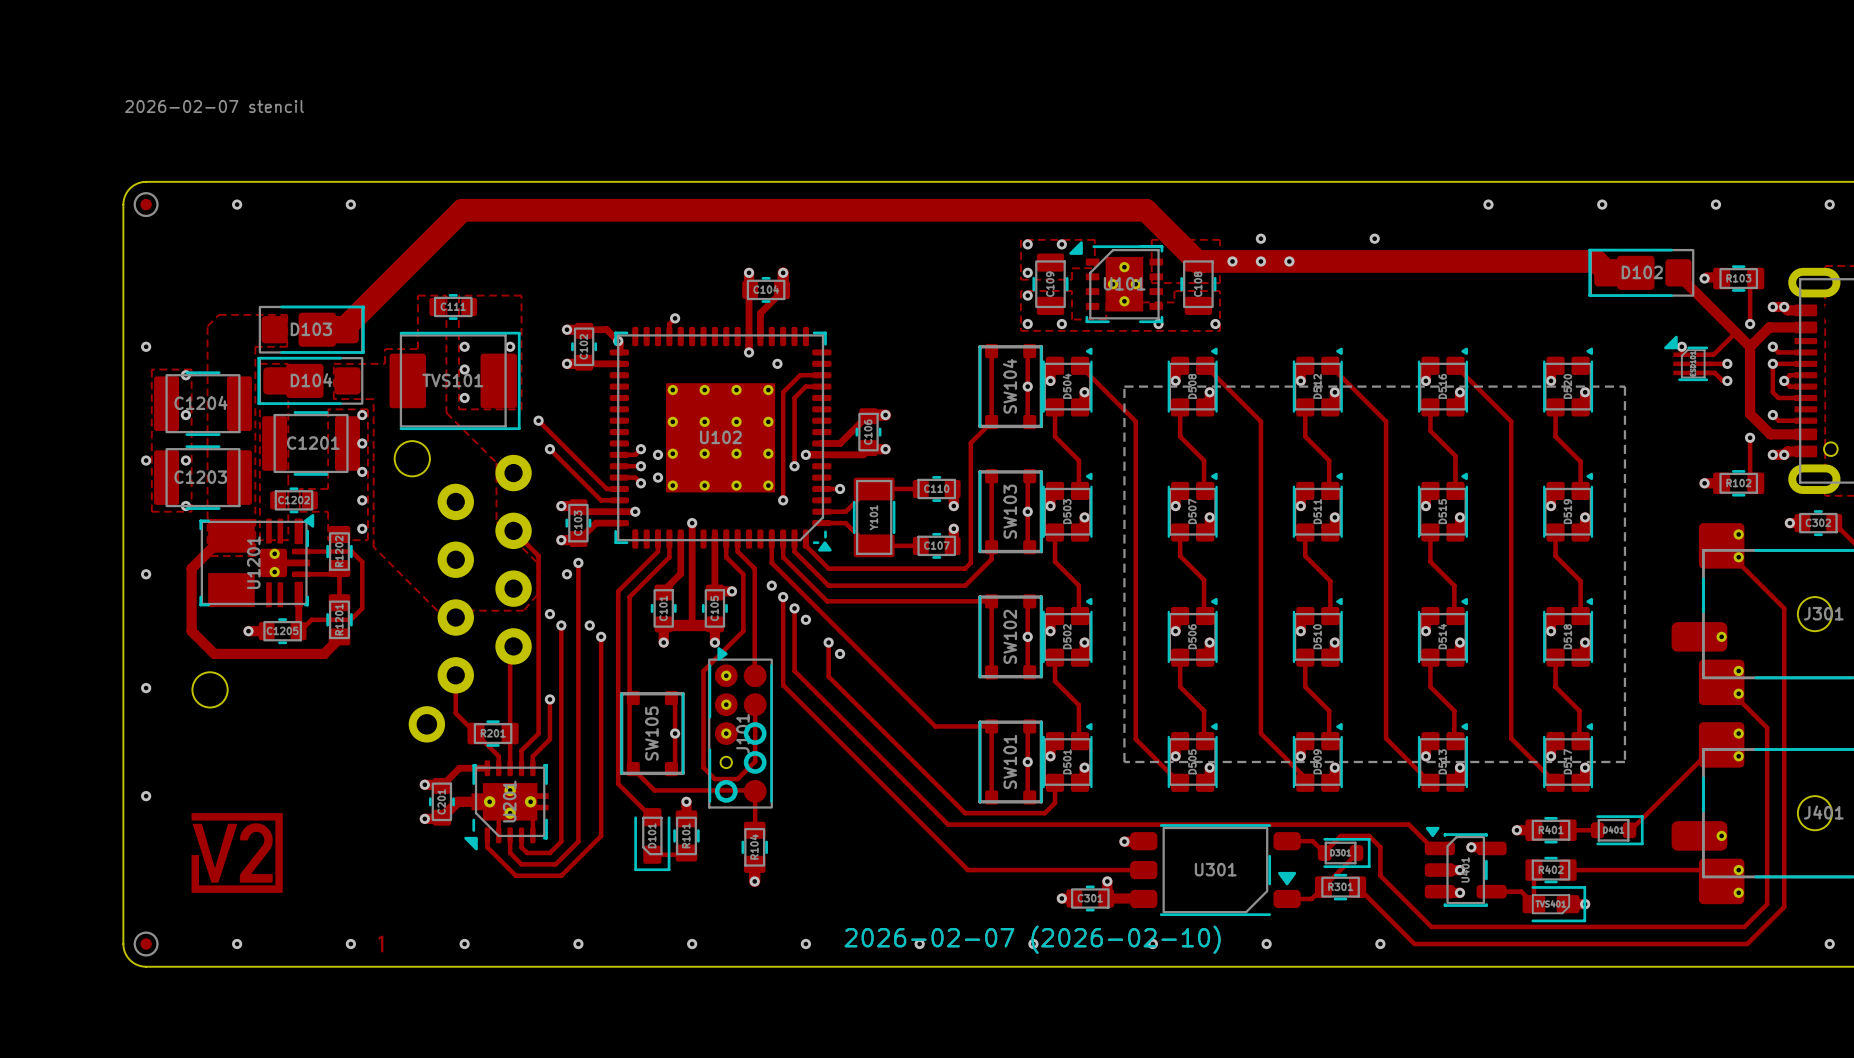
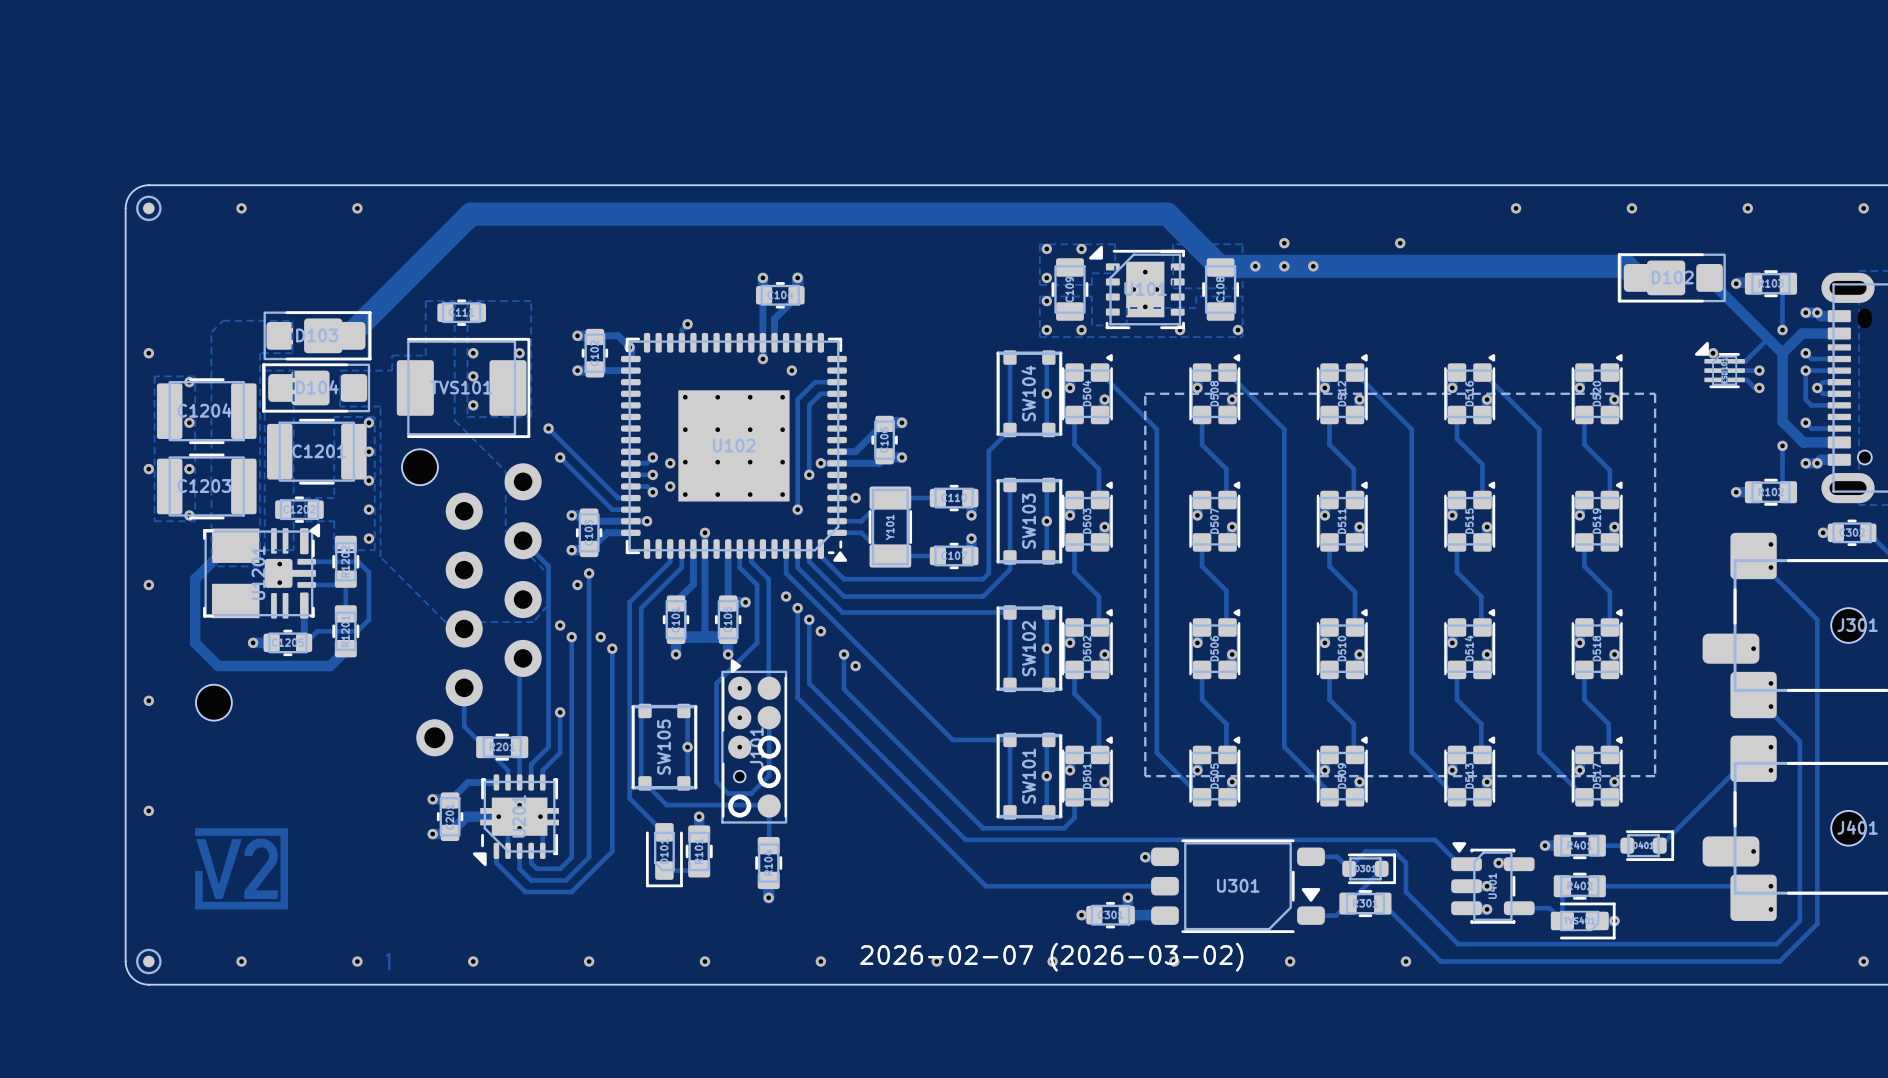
text: 2026-02-07 stencil (214, 106) -> none
drawing shape: [844, 925, 1221, 954] -> [860, 942, 1244, 972]

